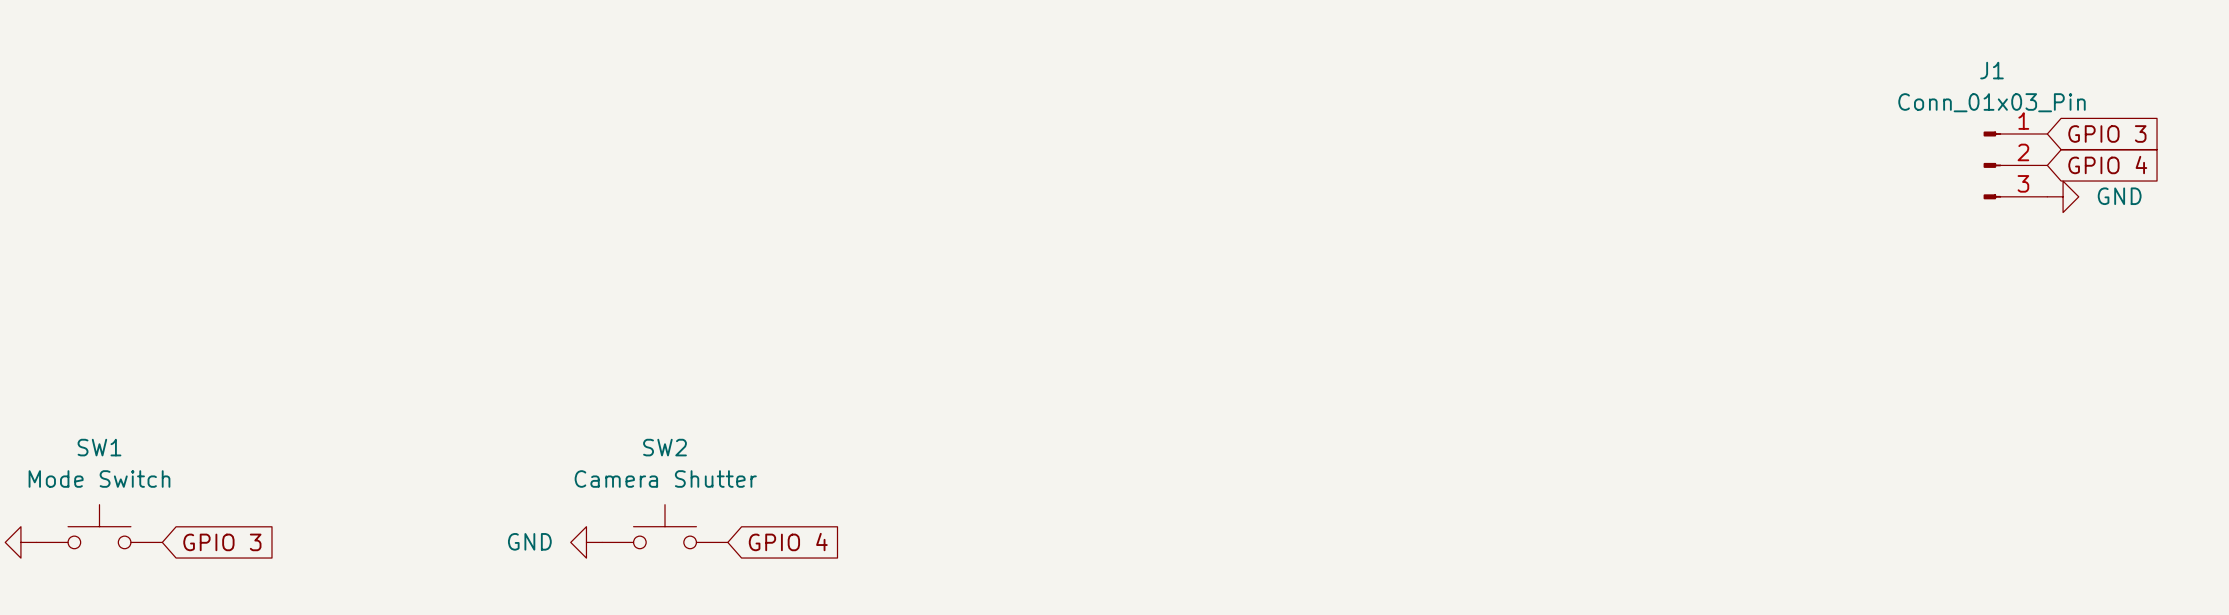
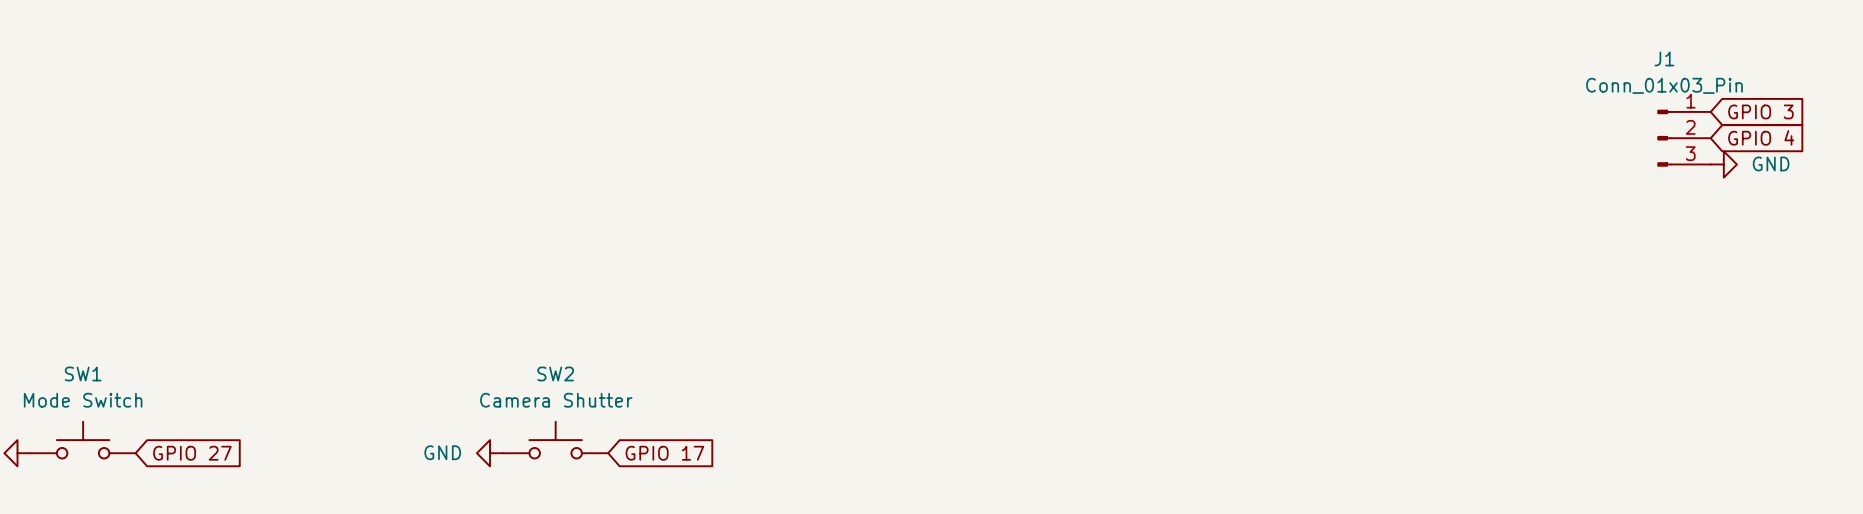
global label: GPIO 3 (222, 542) -> GPIO 27 (192, 453)
global label: GPIO 4 (788, 542) -> GPIO 17 (664, 453)

